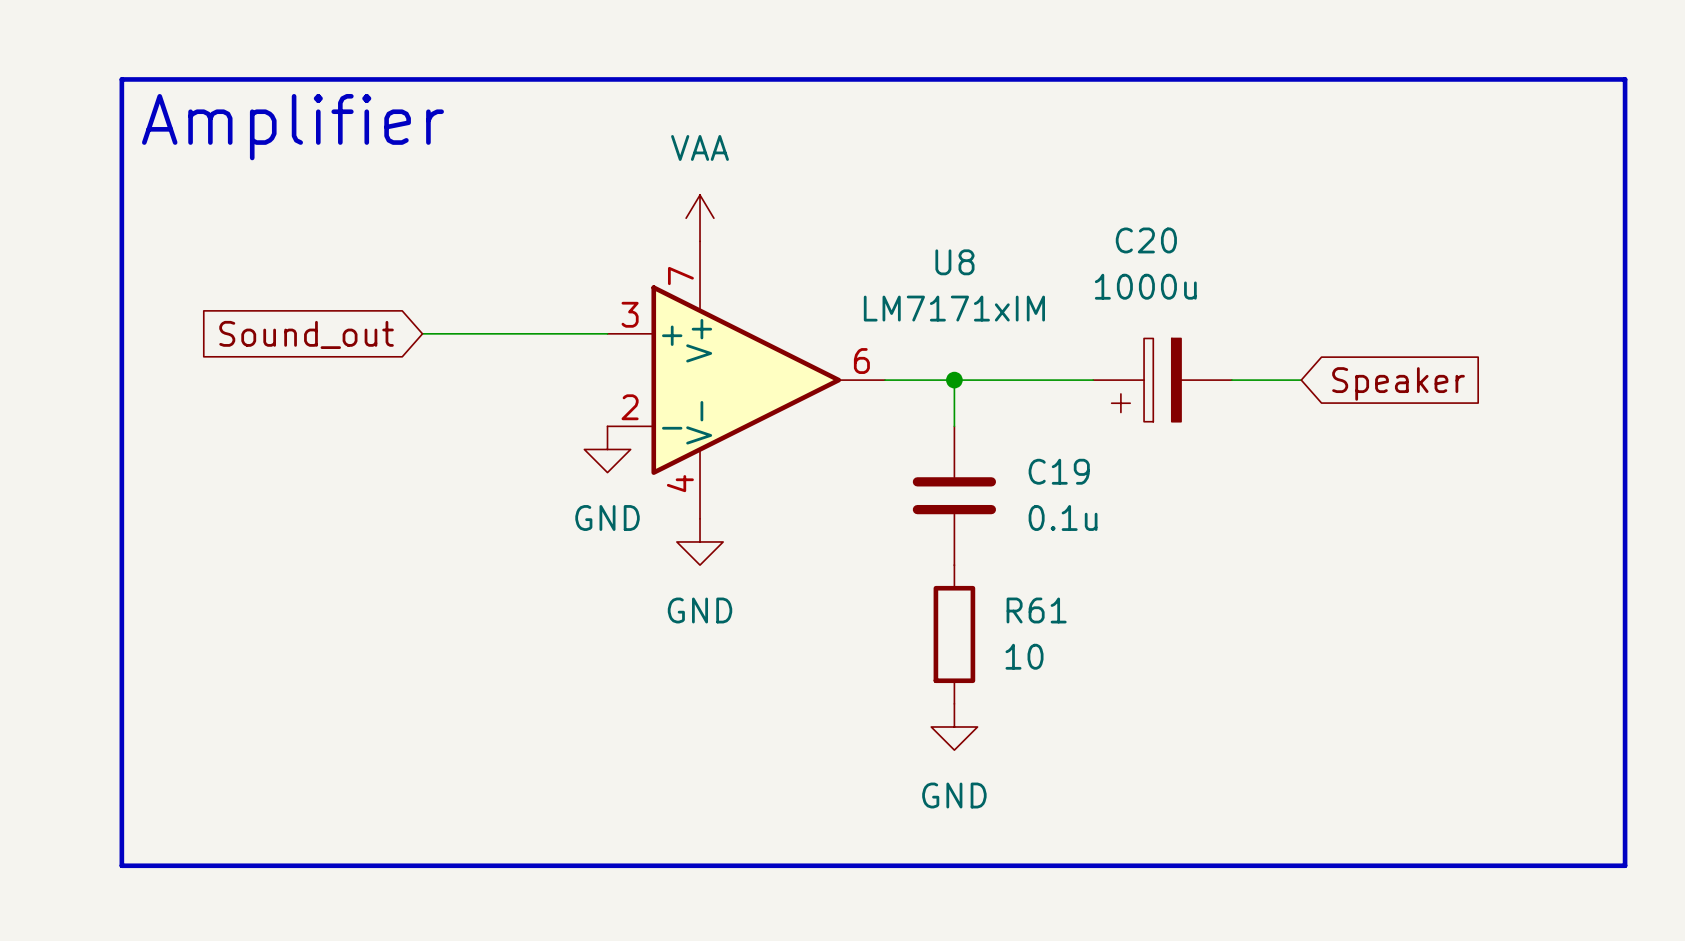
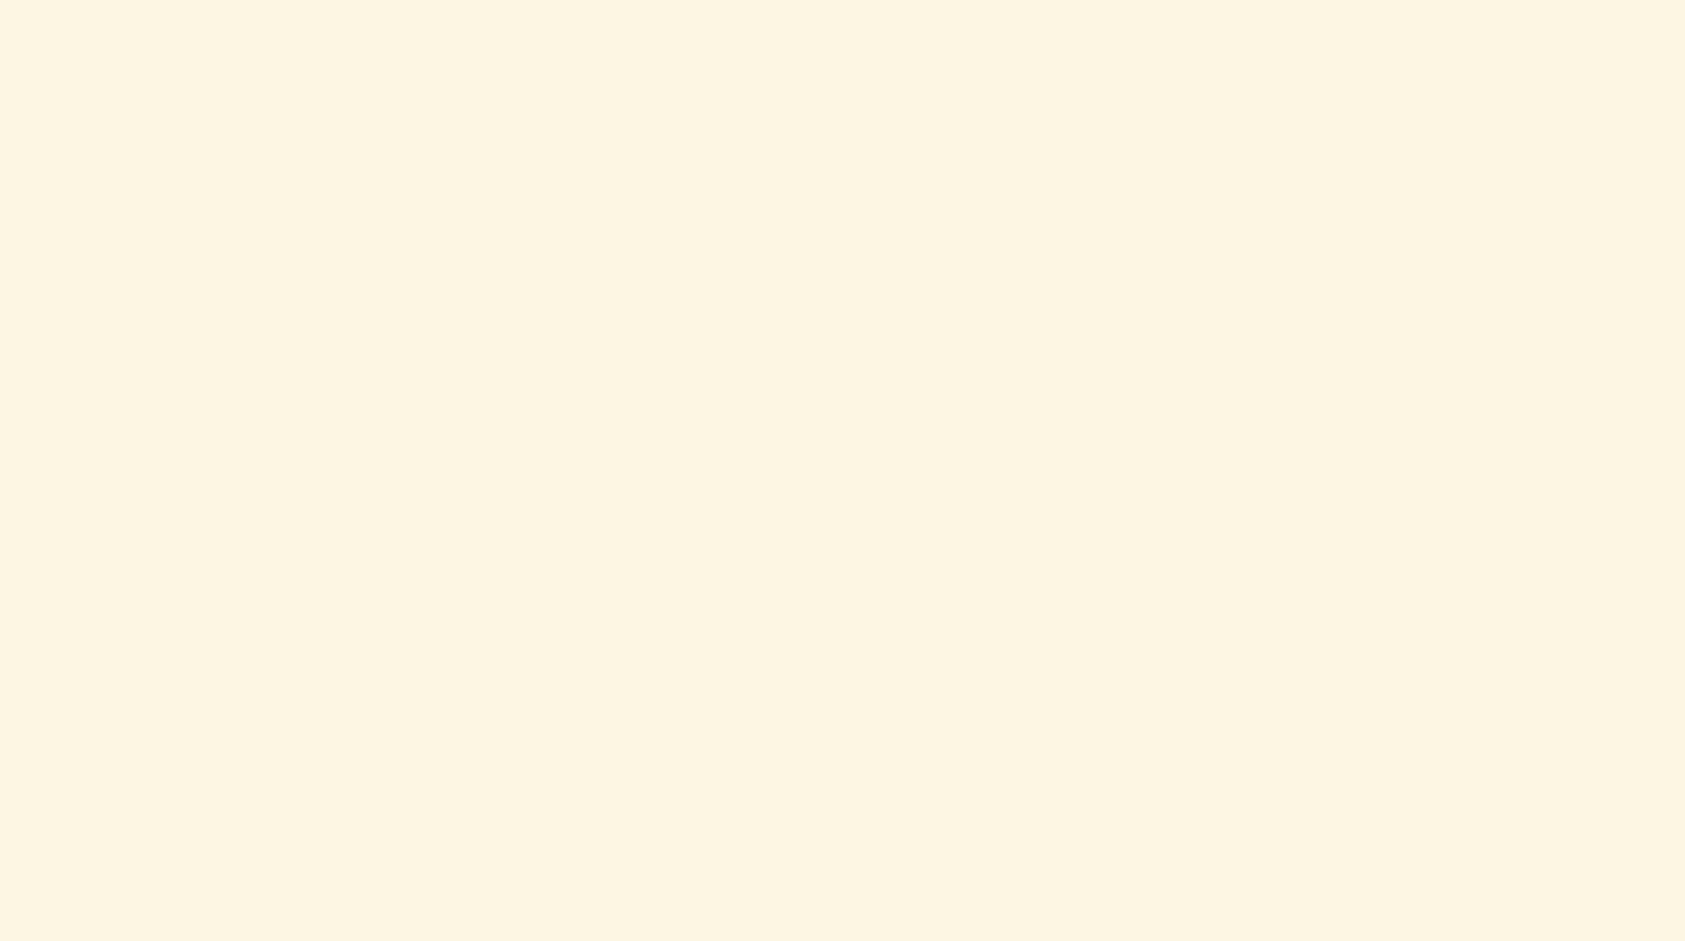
line: (121, 79) (1625, 79) (1625, 865) (121, 865) (121, 79) -> none
text: Amplifier (292, 127) -> none
power symbol: VAA (700, 218) -> none
wire: (422, 333) (607, 333) -> none
global label: Sound_out (306, 334) -> none
U8: LM7171xIM (746, 380) -> none
wire: (885, 380) (1093, 380) -> none
wire: (954, 380) (954, 426) -> none
junction: (954, 380) -> none
C20: 1000u (1162, 380) -> none
wire: (1231, 380) (1301, 380) -> none
global label: Speaker (1398, 383) -> none
power symbol: GND (607, 449) -> none
C19: 0.1u (954, 495) -> none
power symbol: GND (700, 541) -> none
R61: 10 (954, 634) -> none
power symbol: GND (954, 726) -> none

